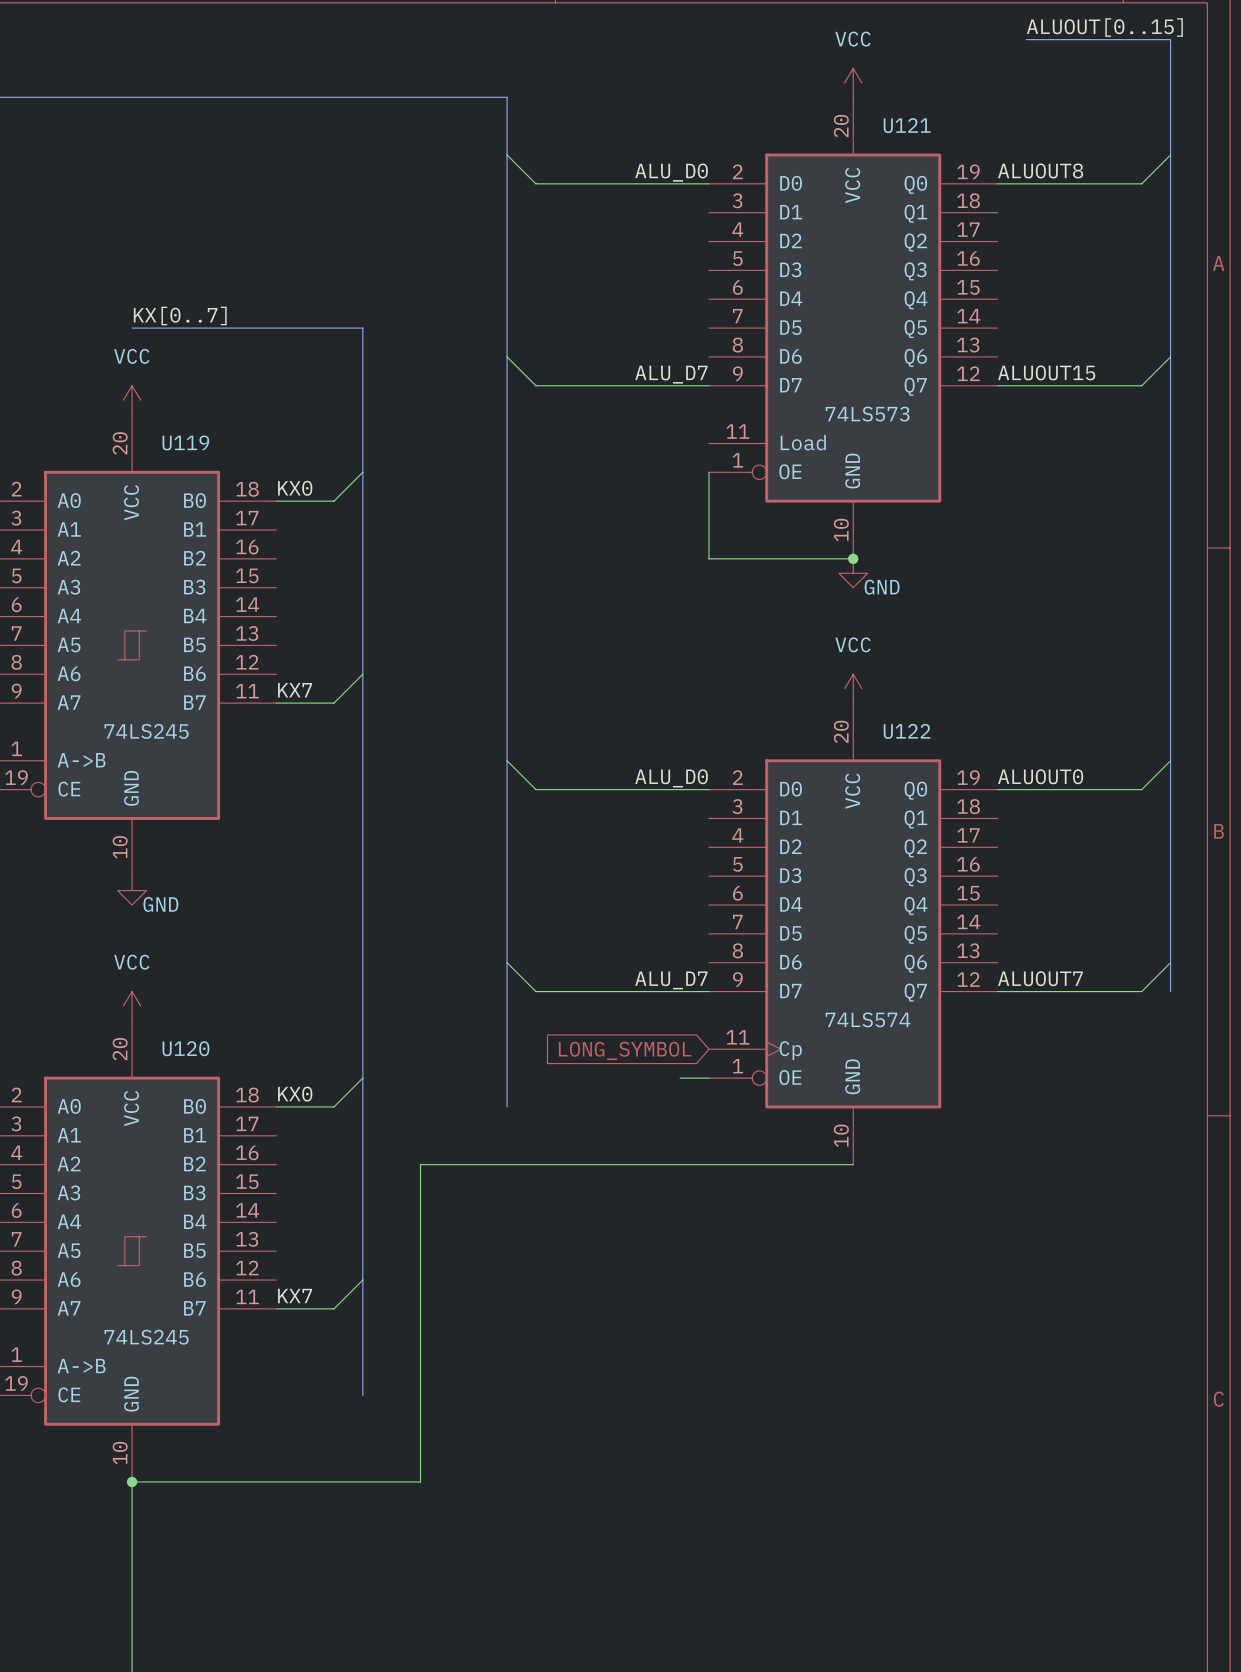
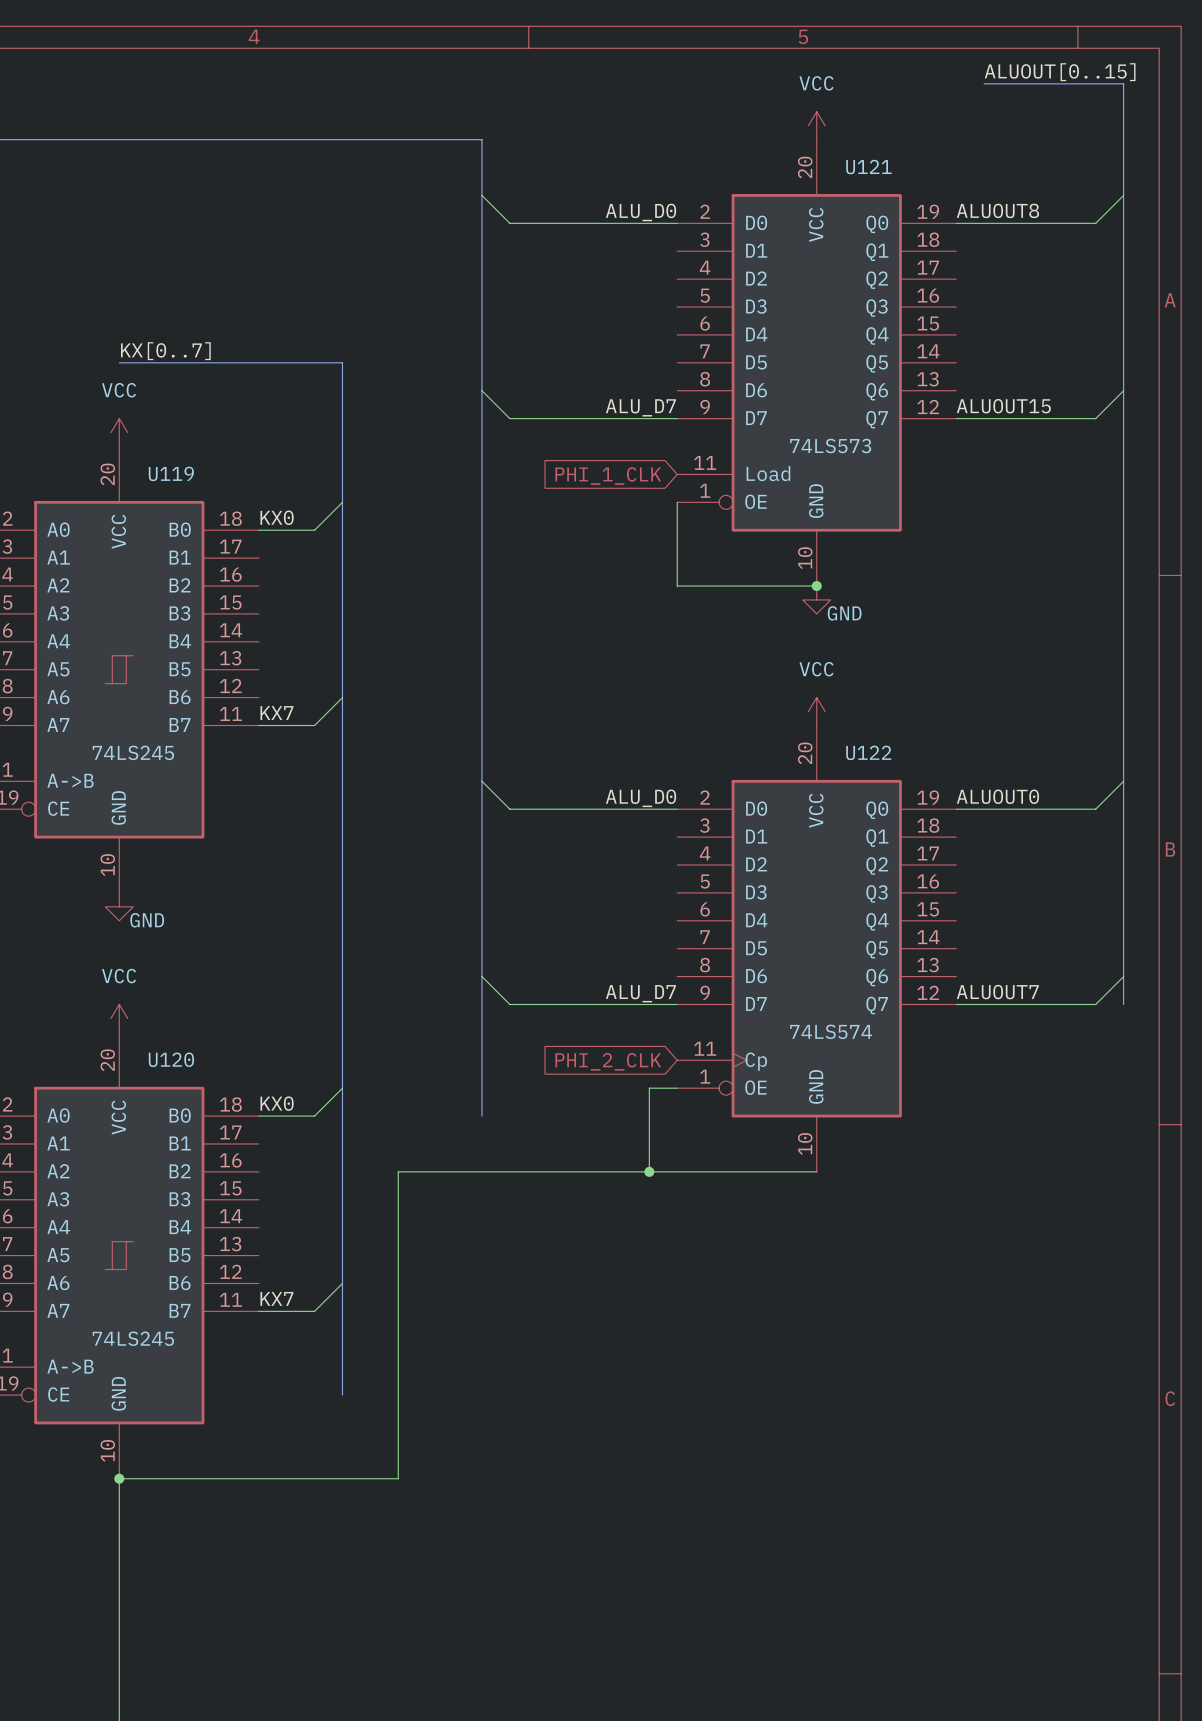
global label: none -> PHI_1_CLK (608, 476)
global label: LONG_SYMBOL (625, 1050) -> PHI_2_CLK (608, 1061)
wire: none -> (649, 1088) (649, 1171)
junction: none -> (649, 1171)

